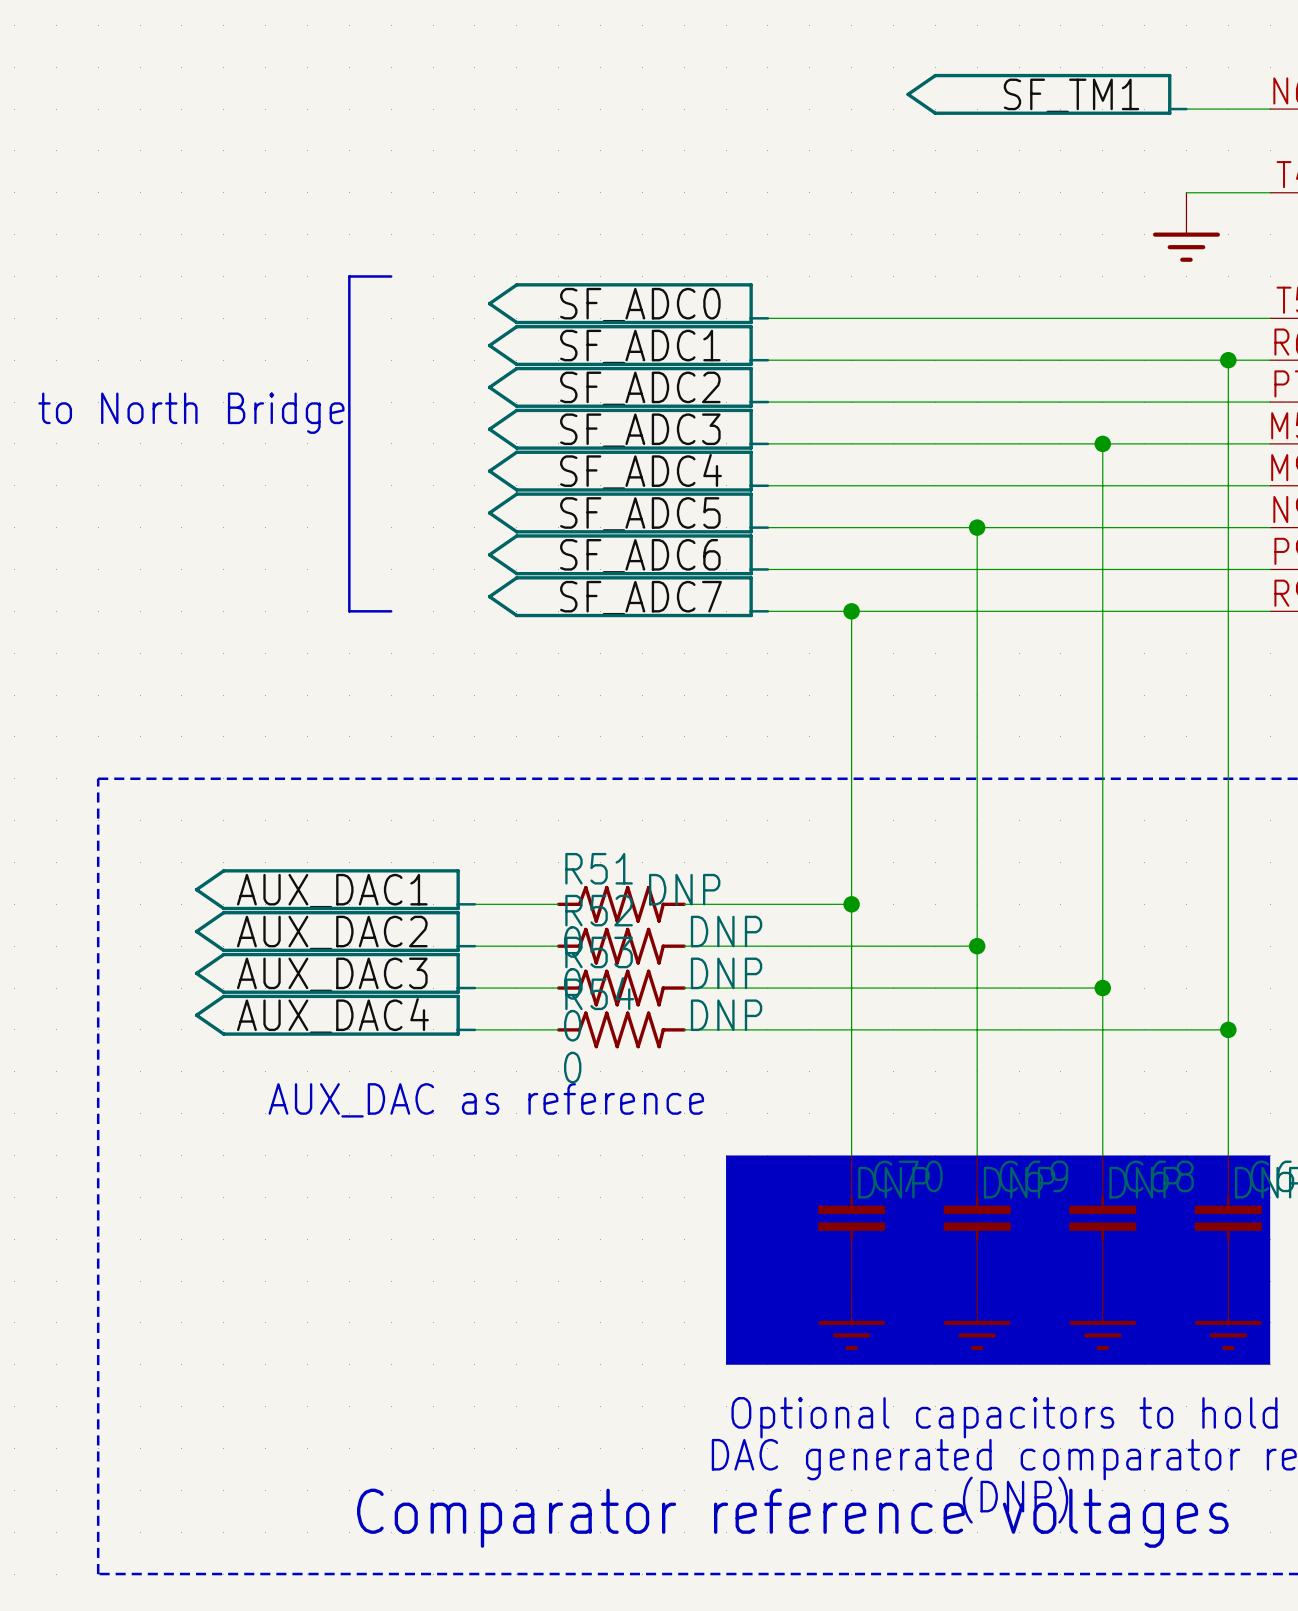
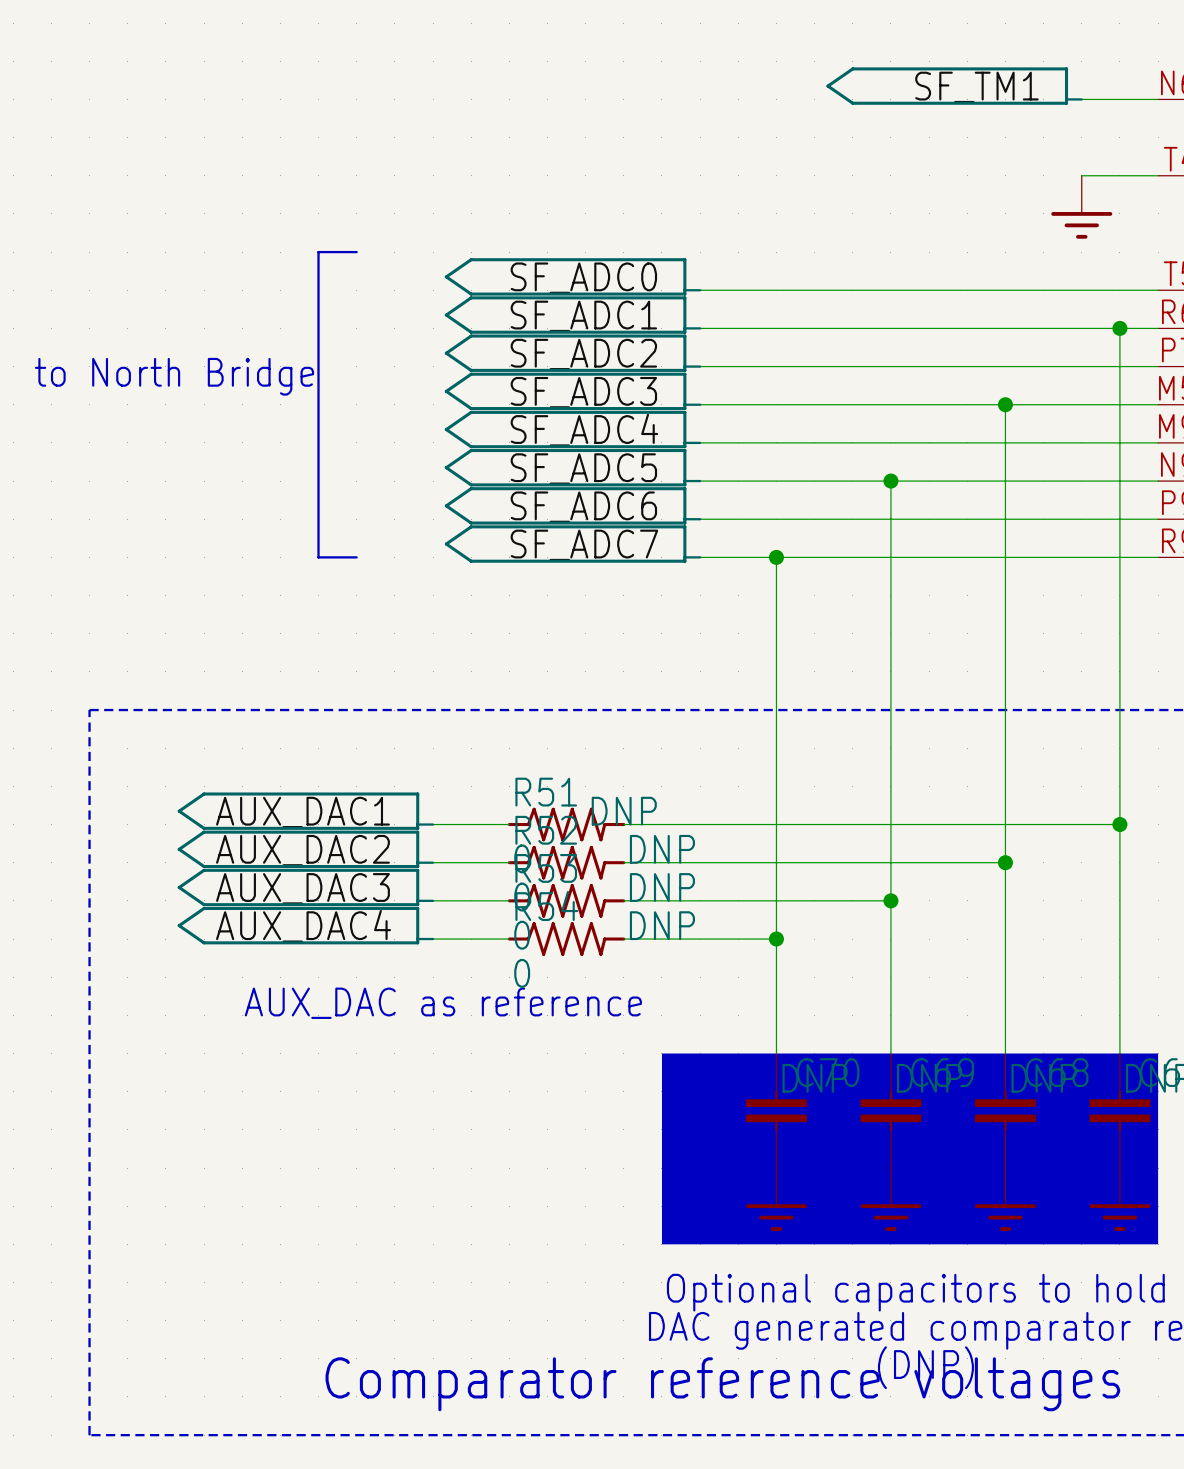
junction: (851, 904) -> none
junction: none -> (1119, 824)
junction position: (977, 946) -> (890, 900)
wire: (977, 988) (1102, 988) -> (890, 862) (1005, 862)
junction position: (1102, 988) -> (1005, 862)
wire: (851, 1029) (1228, 1029) -> (776, 824) (1119, 824)
junction: none -> (776, 939)
junction: (1228, 1029) -> none

